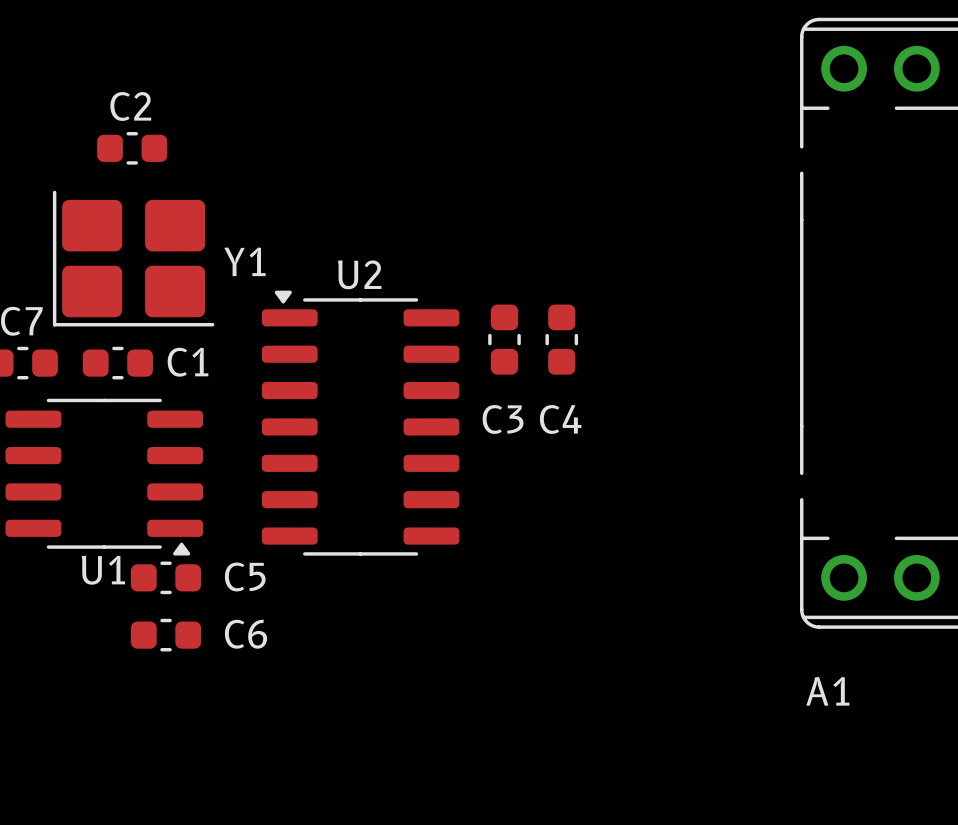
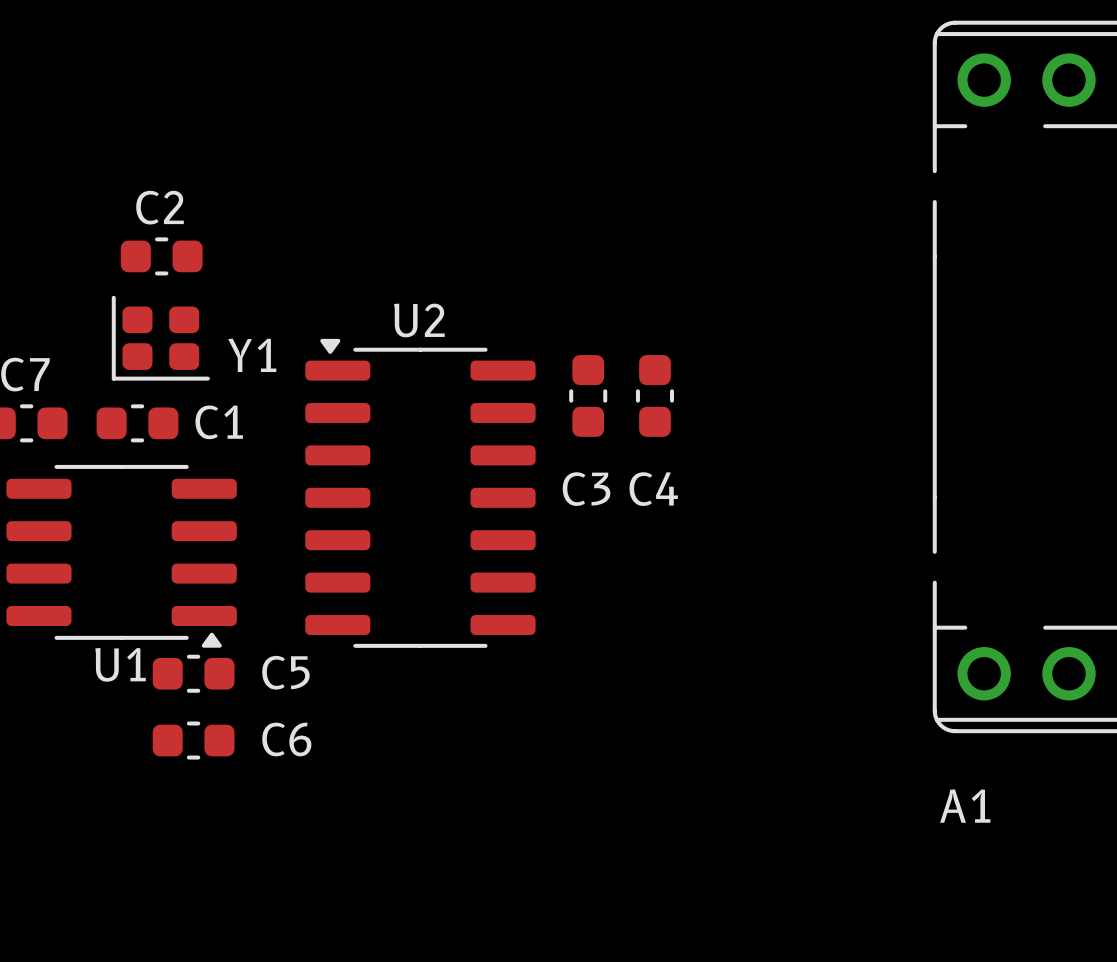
C2 position: (132, 148) -> (161, 256)
Y1 footprint: [52, 190, 215, 327] -> [111, 295, 210, 381]

